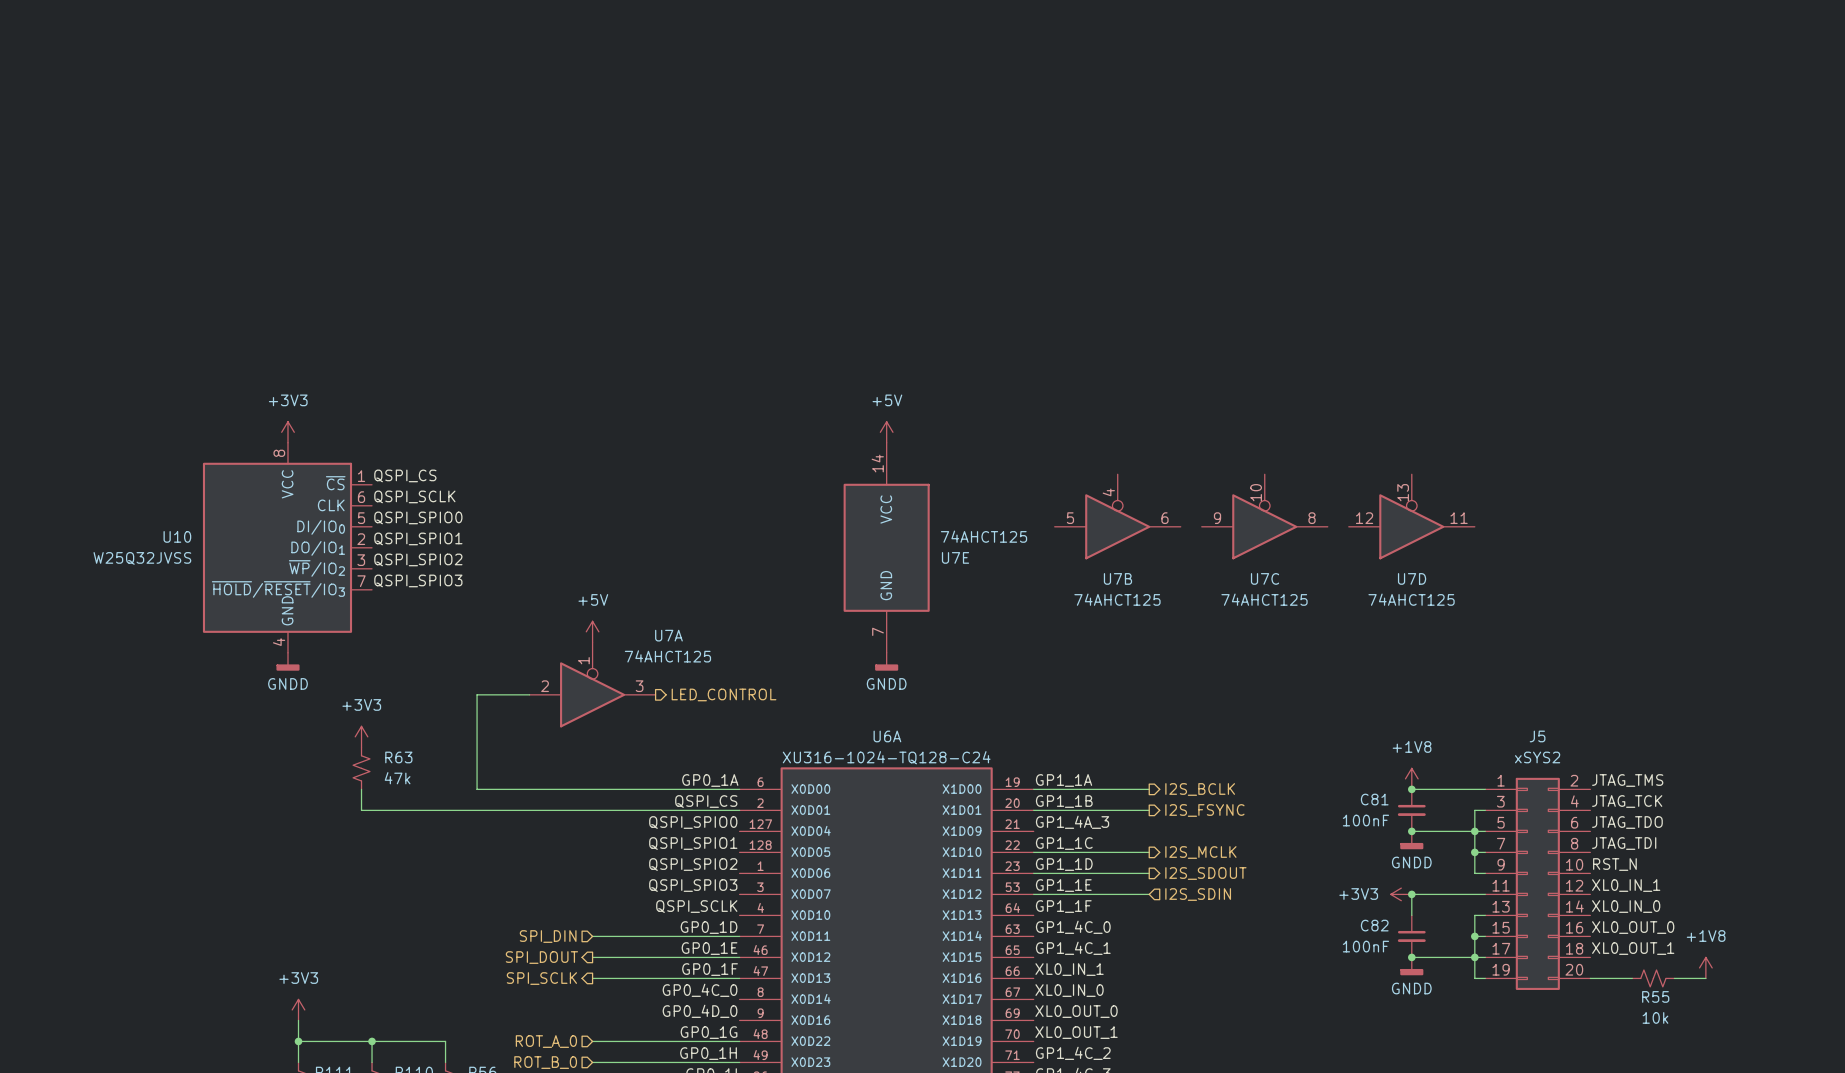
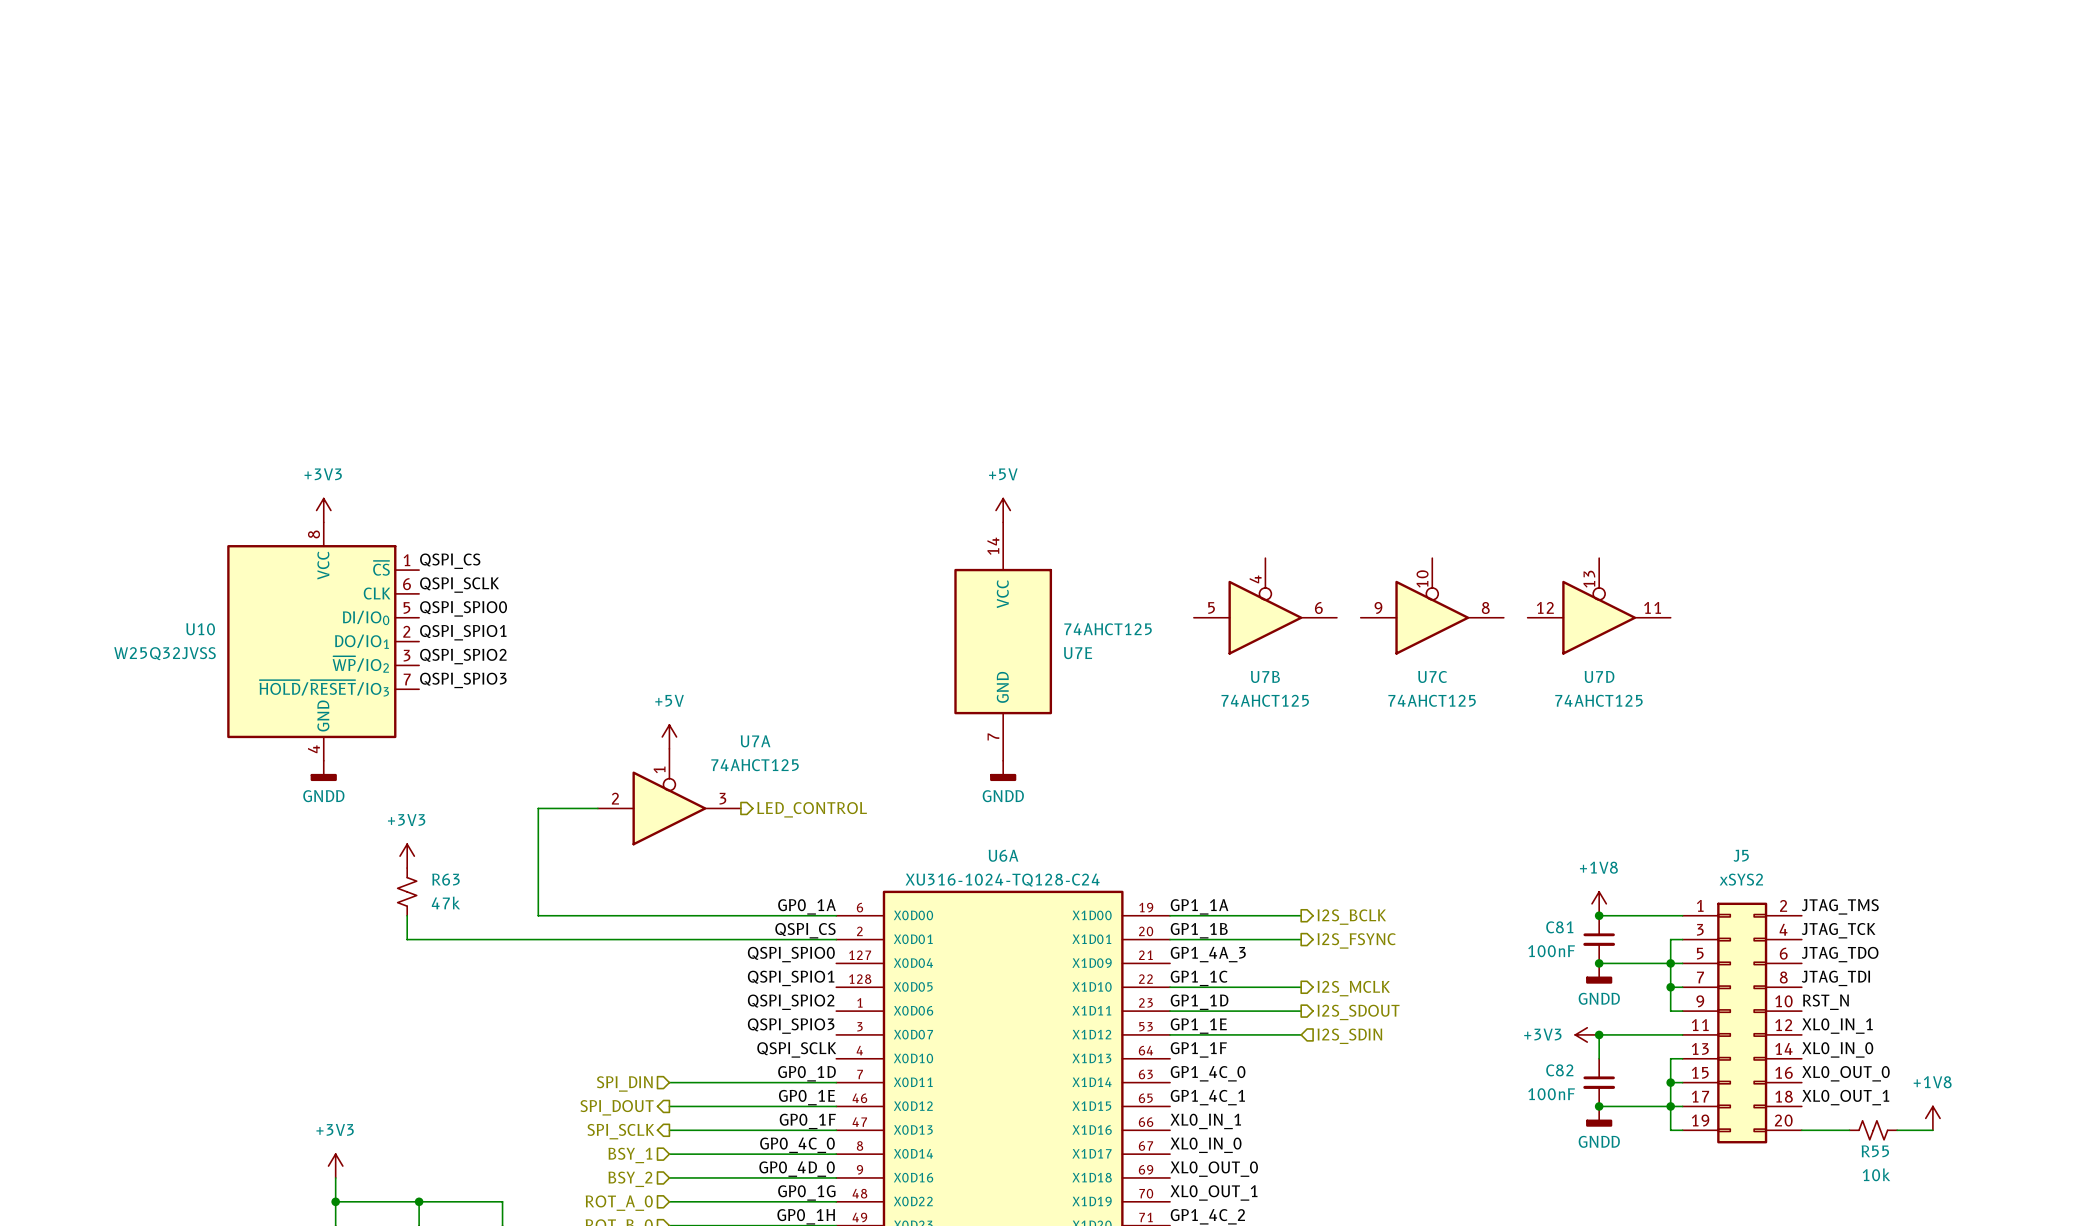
hierarchical label: none -> BSY_1 (630, 1155)
wire: none -> (669, 1154) (836, 1154)
hierarchical label: none -> BSY_2 (630, 1179)
wire: none -> (669, 1177) (836, 1177)

